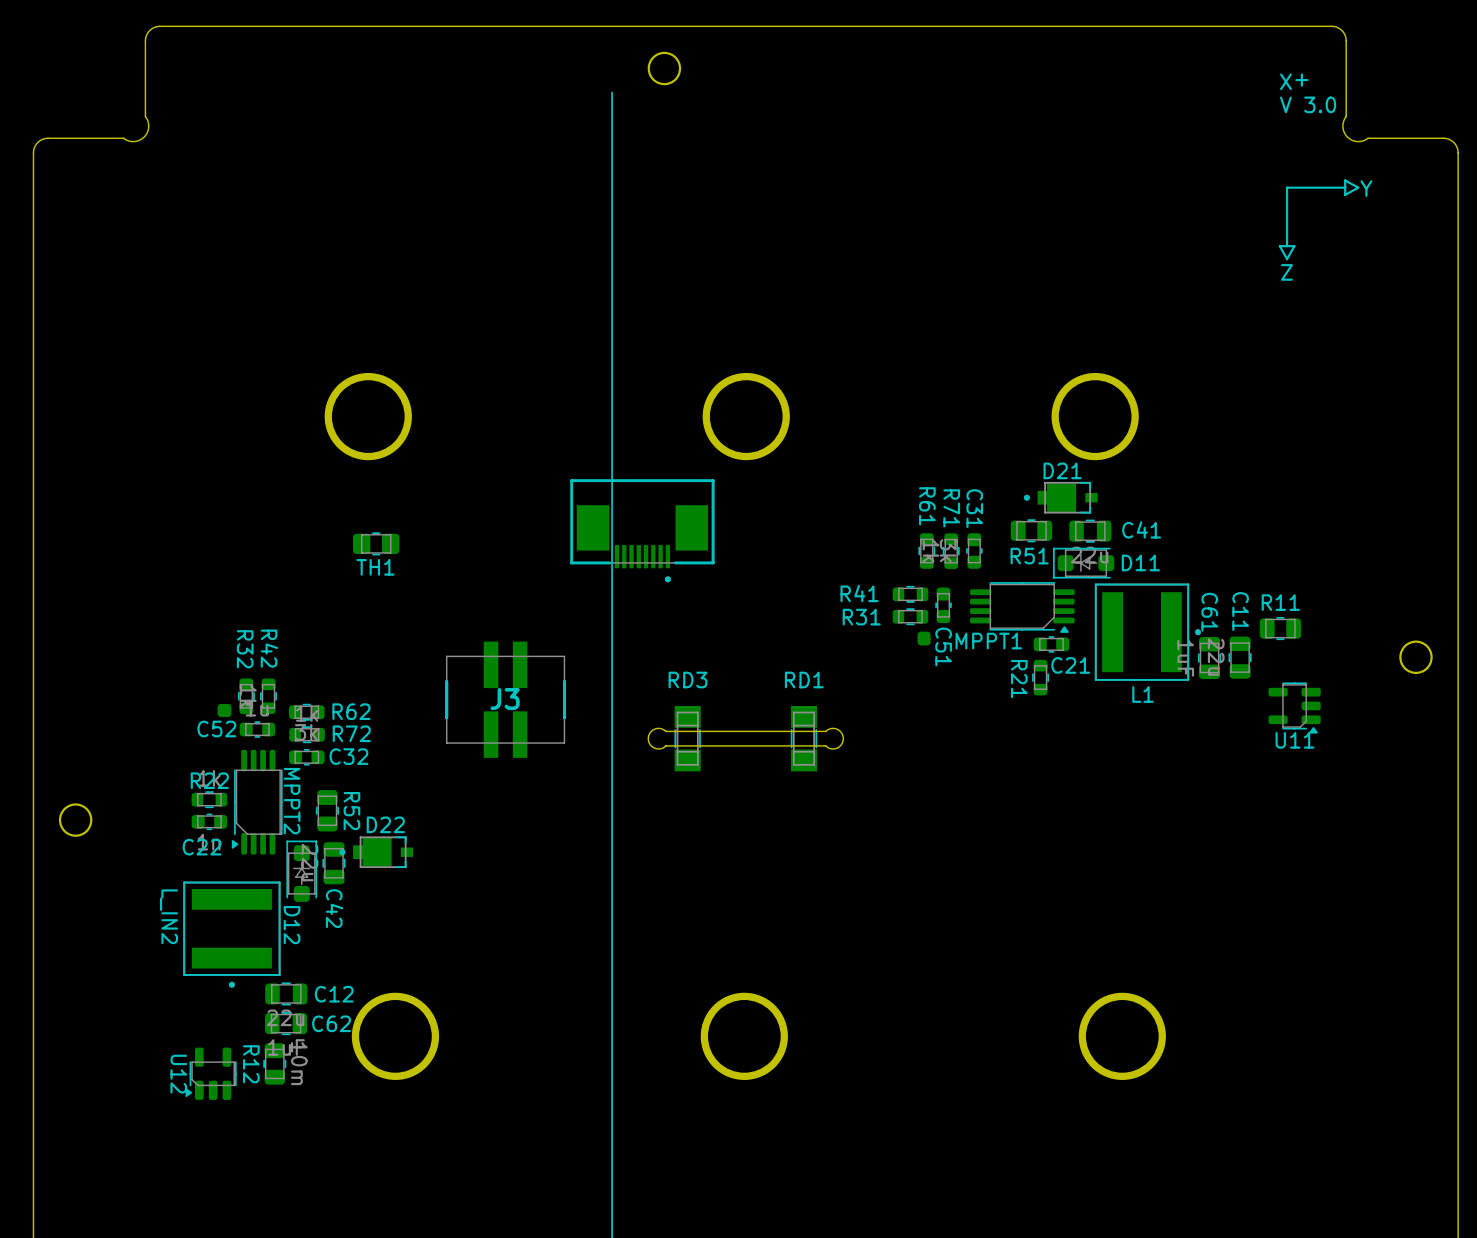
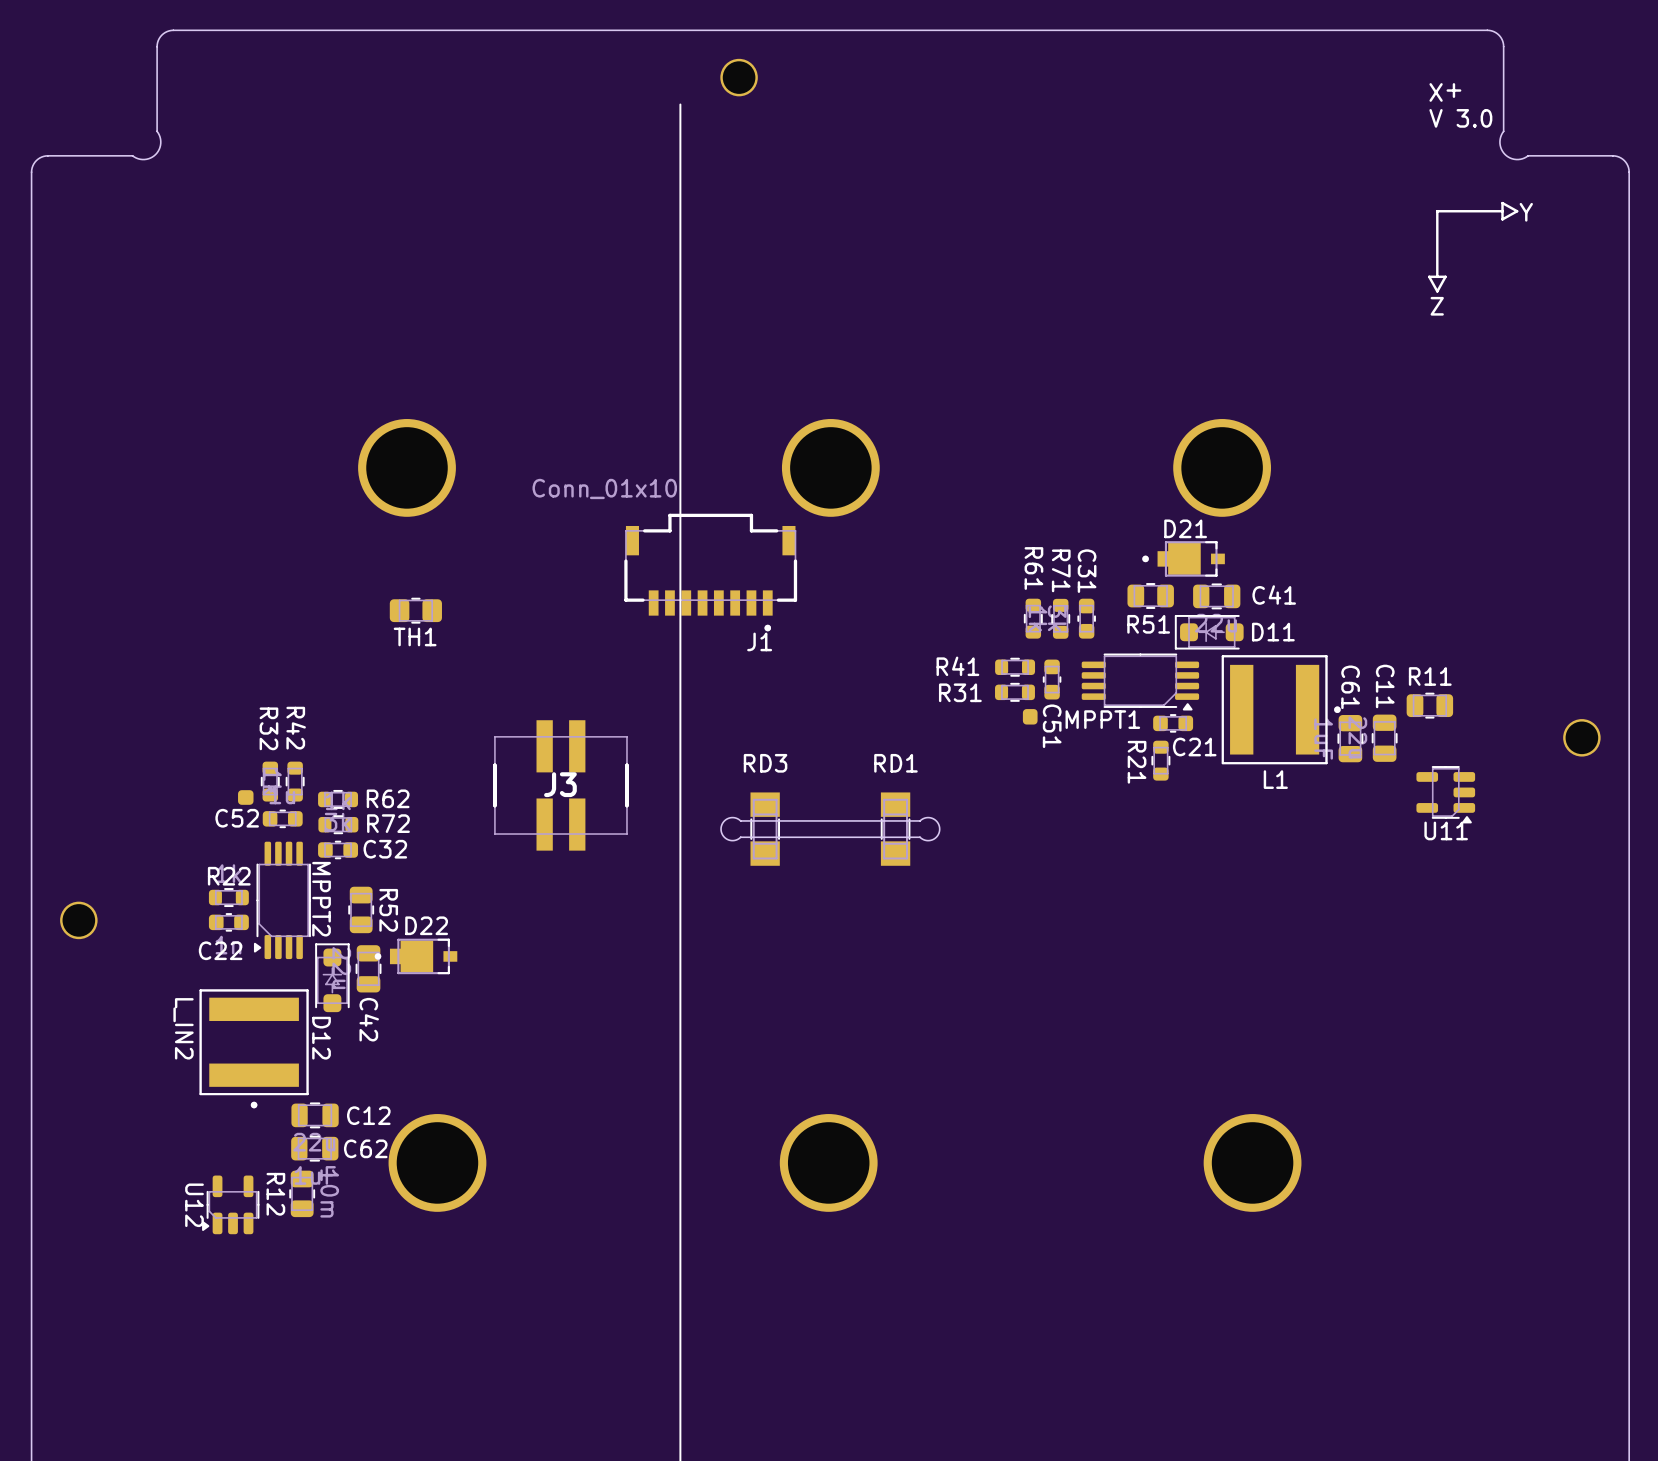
J1: none -> Conn_01x10 (710, 572)
part: (642, 530) -> none

